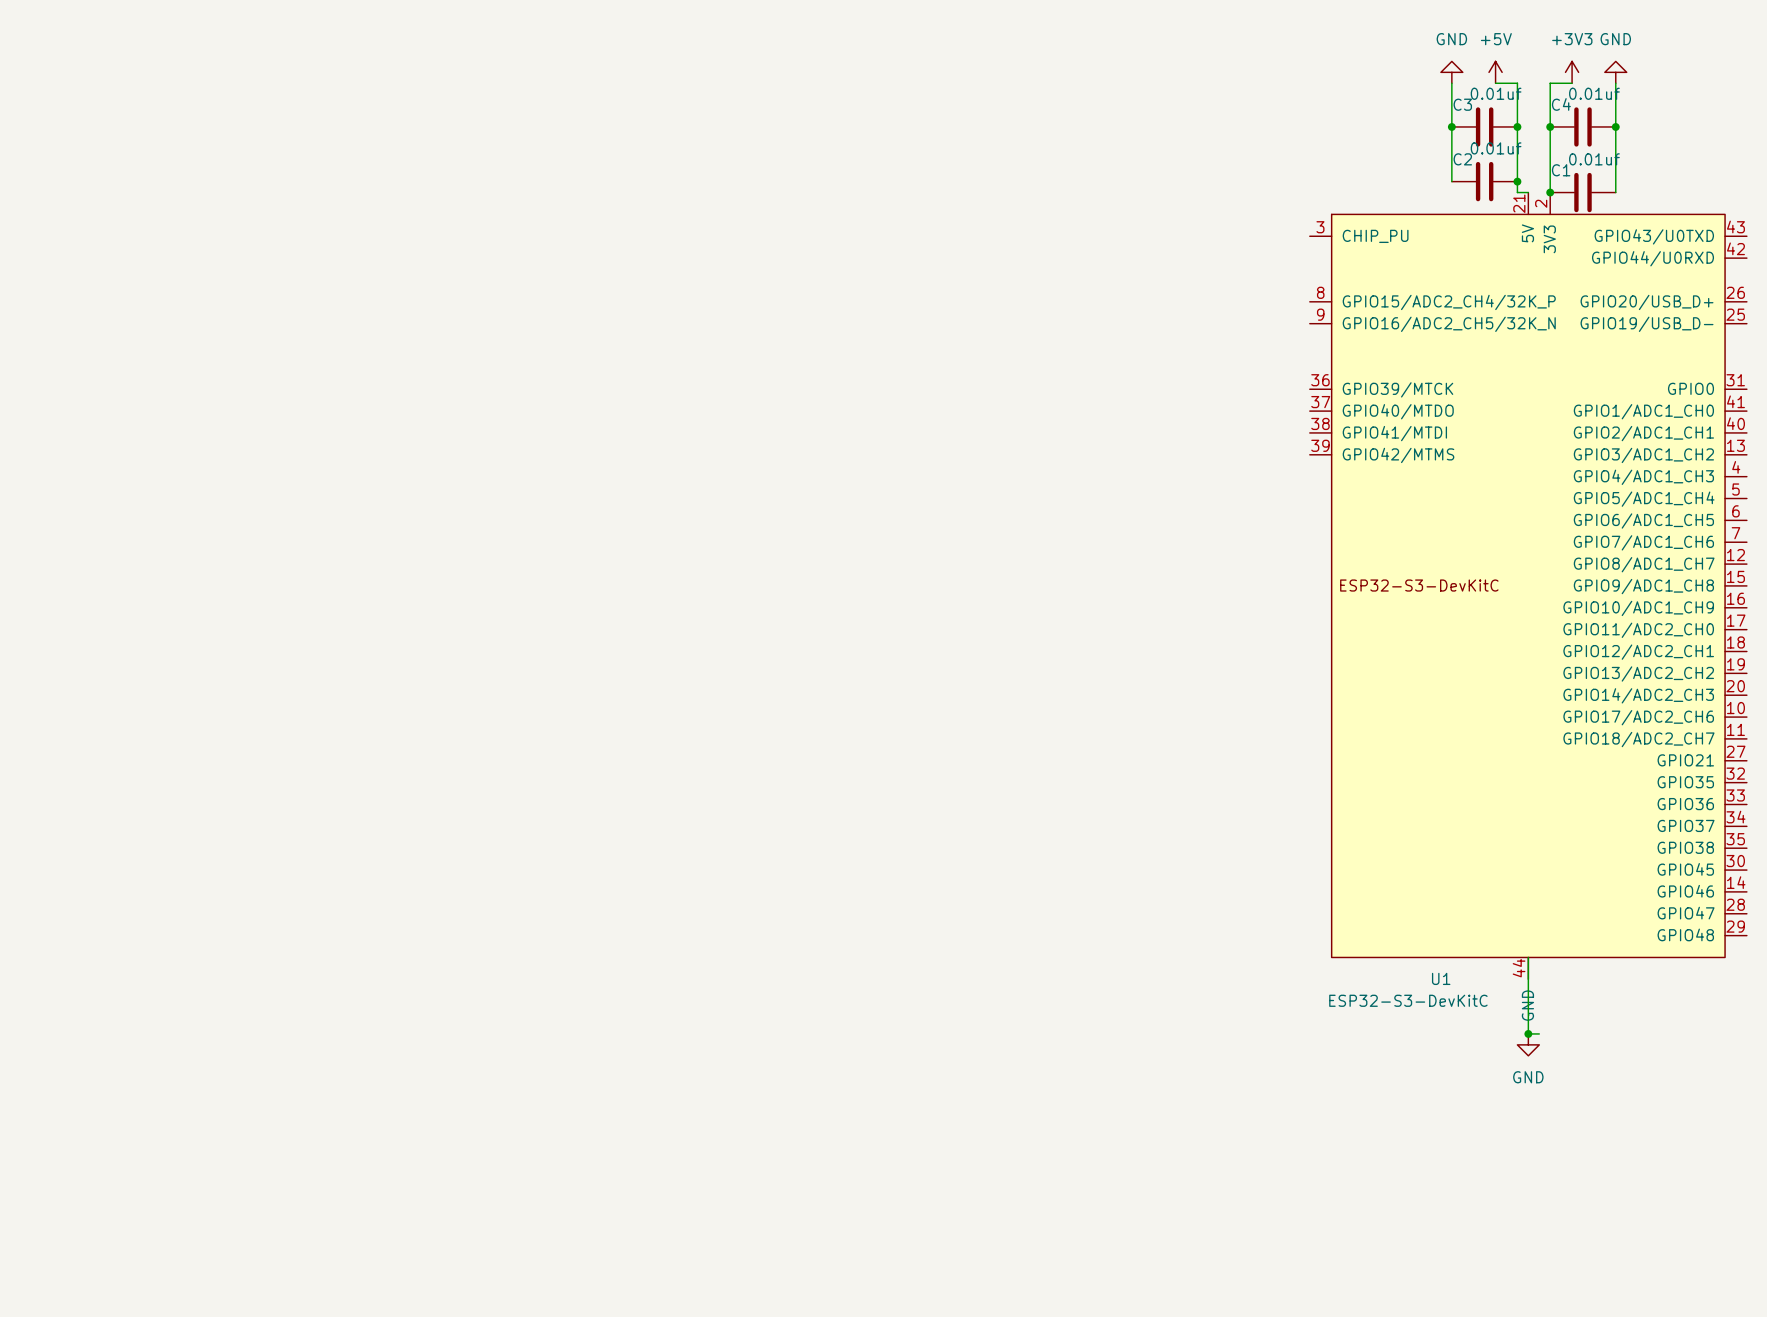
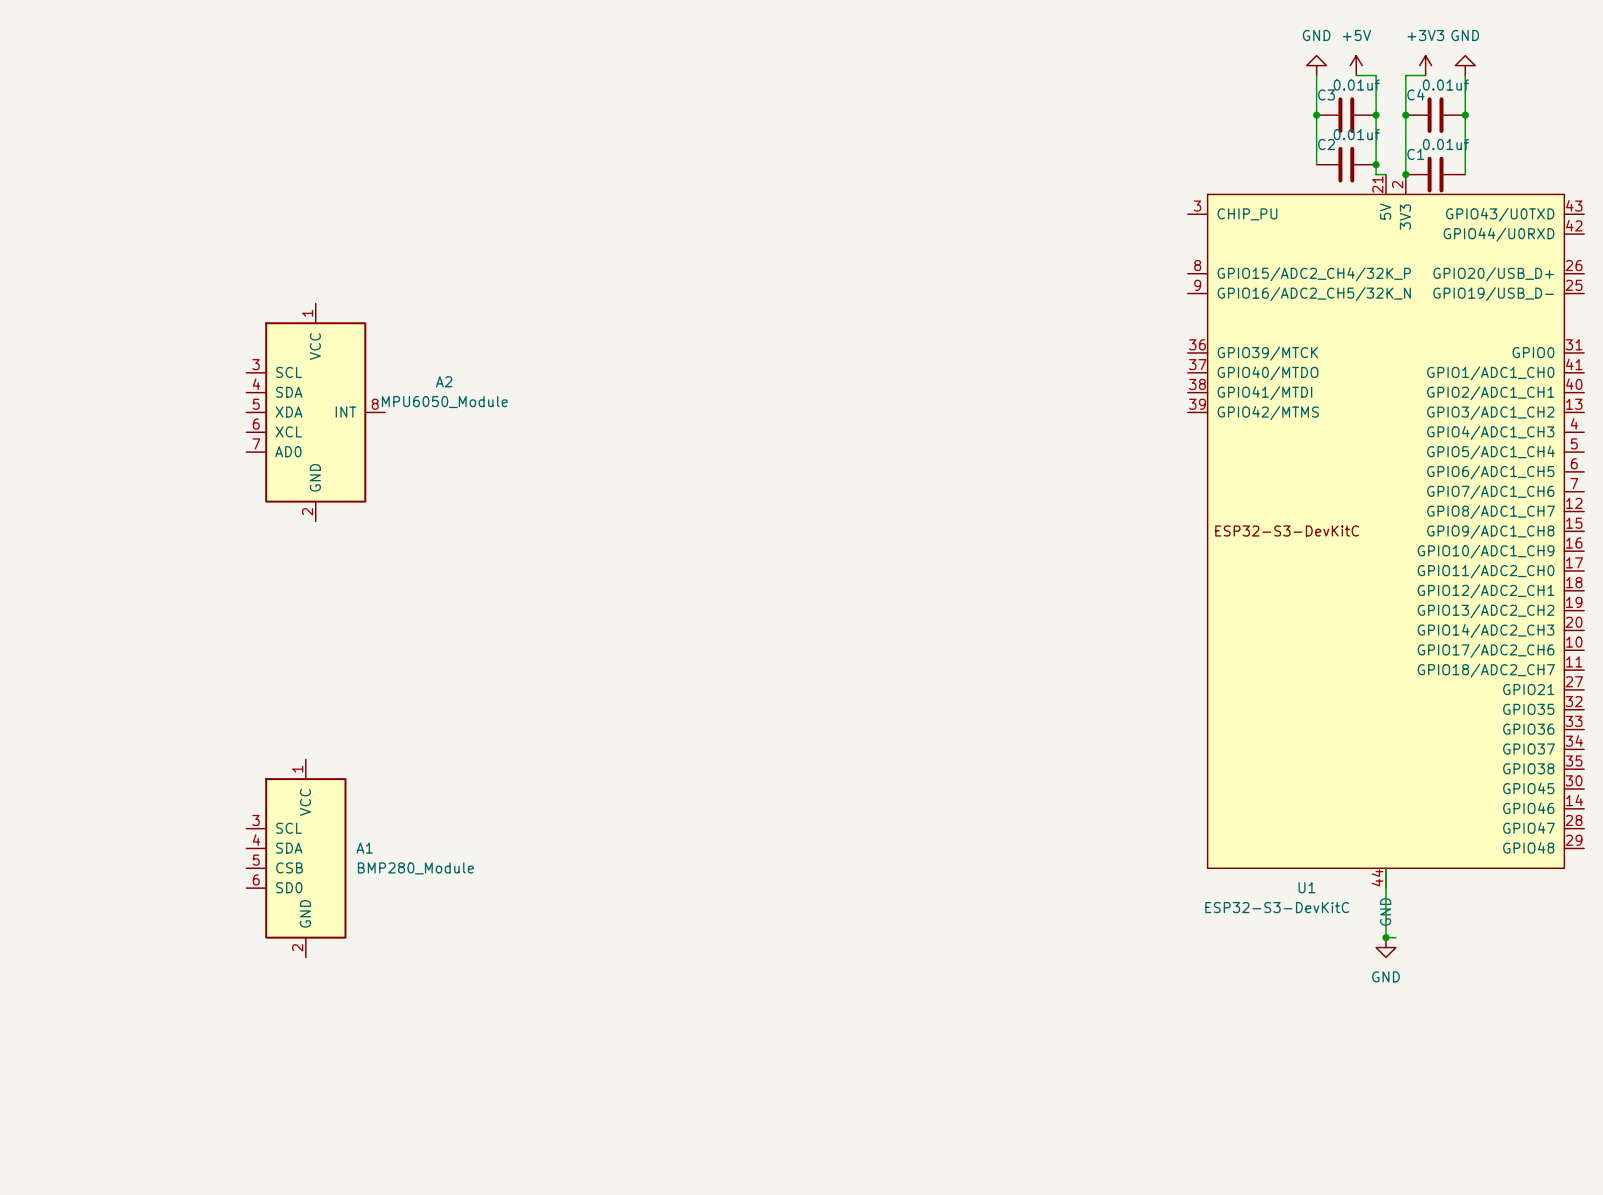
A2: none -> MPU6050_Module (315, 412)
A1: none -> BMP280_Module (296, 858)

